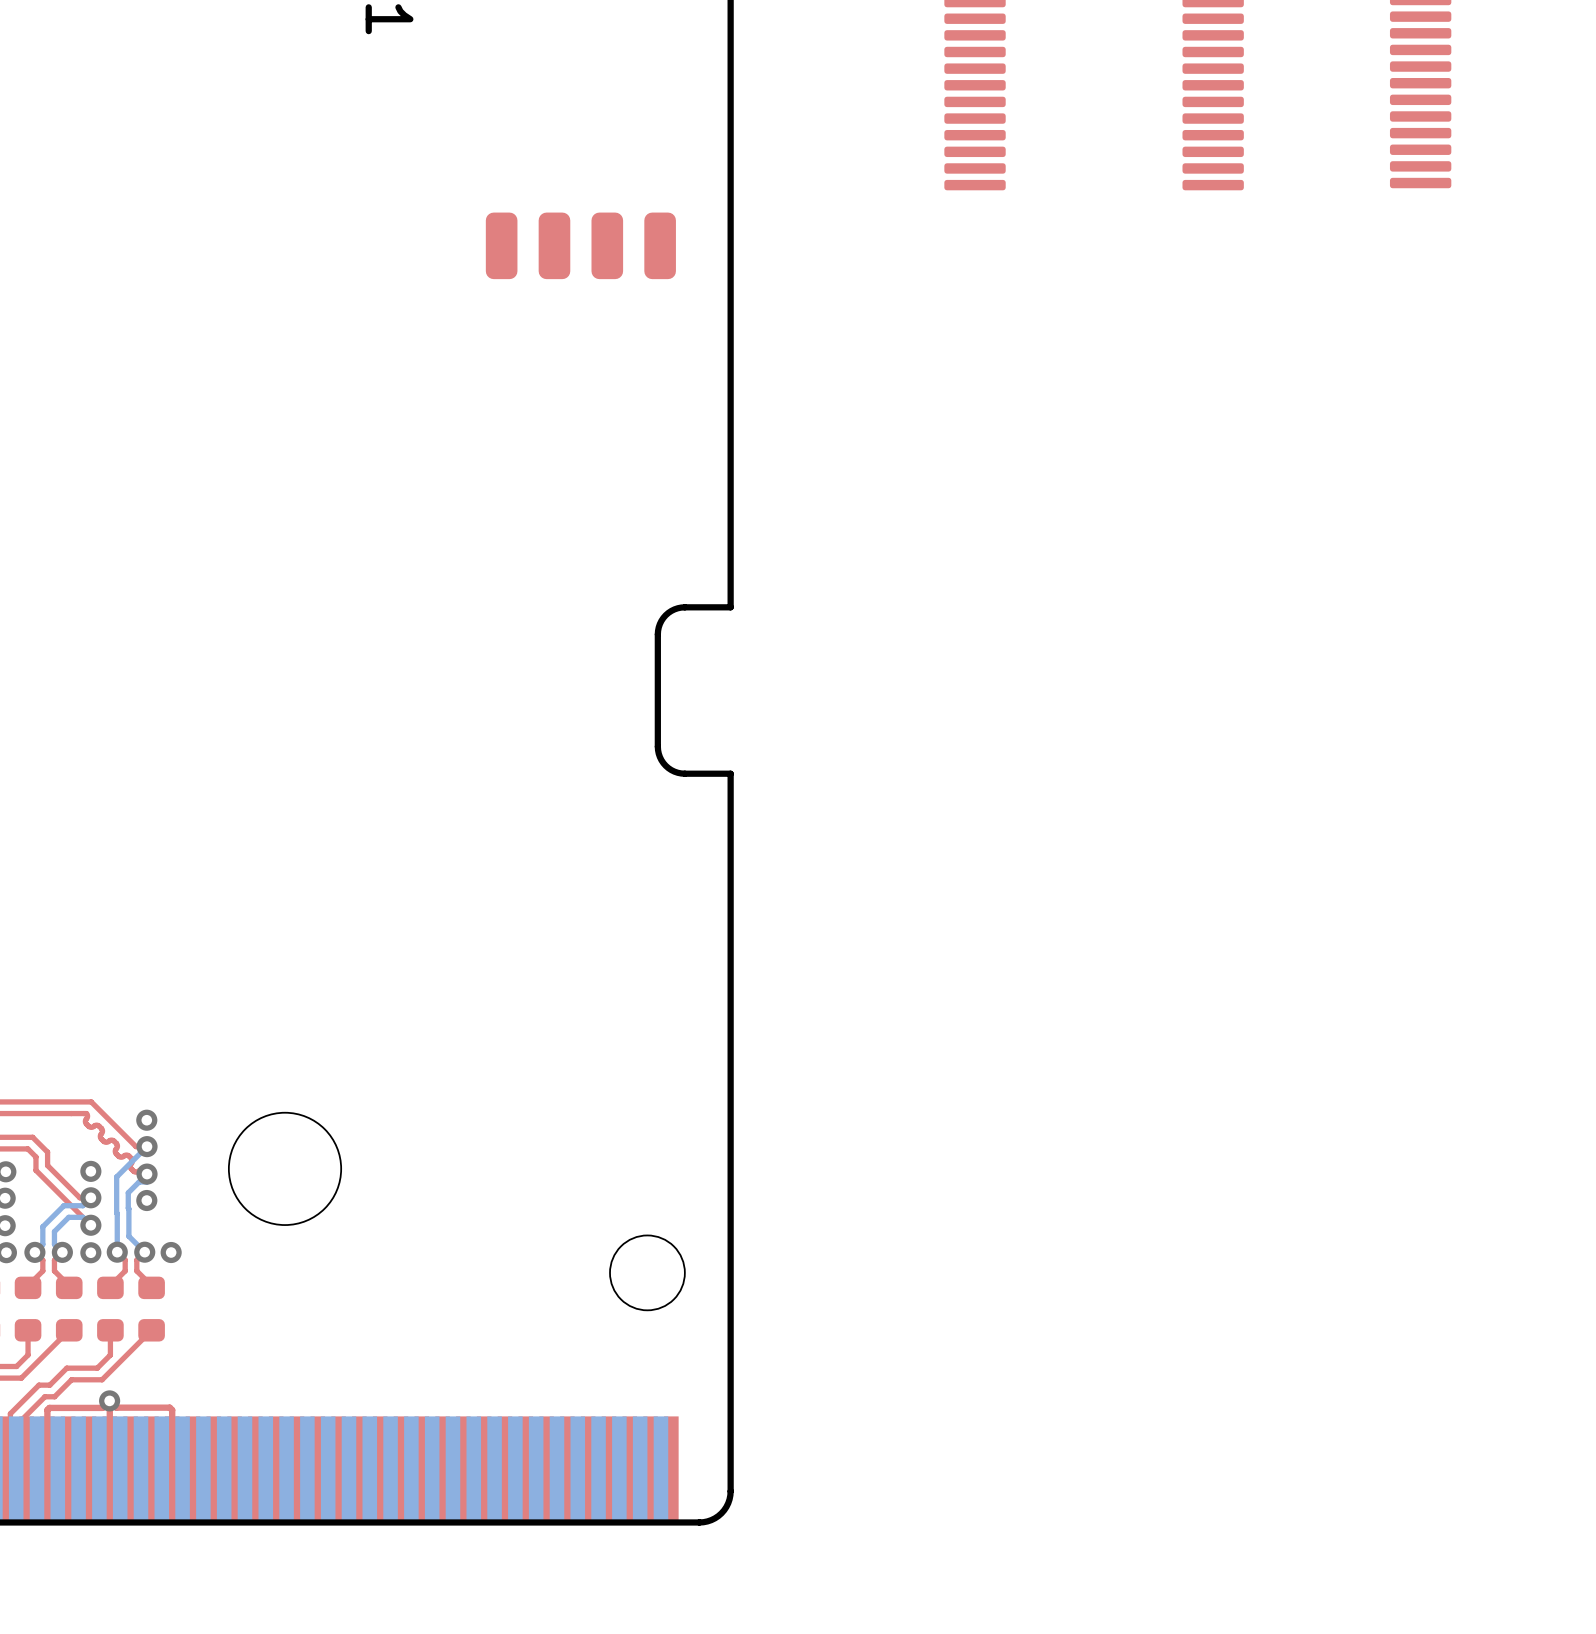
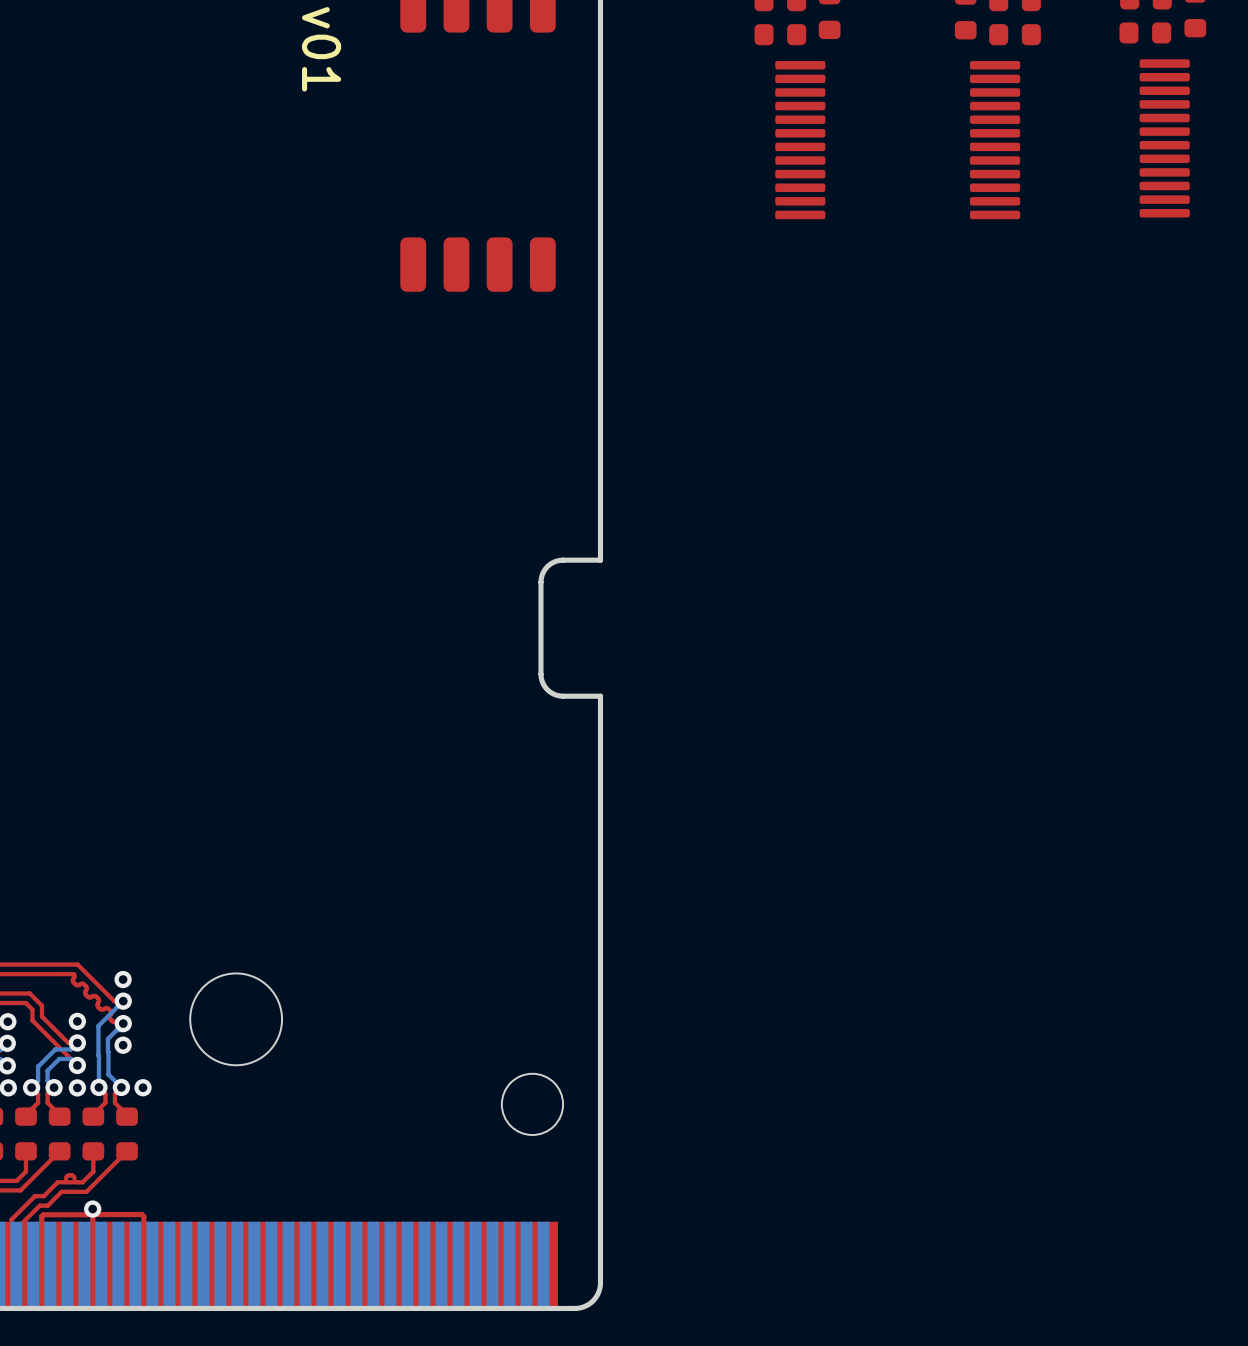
top track: none -> (74, 1178) (71, 1175) (67, 1175) (65, 1178)

